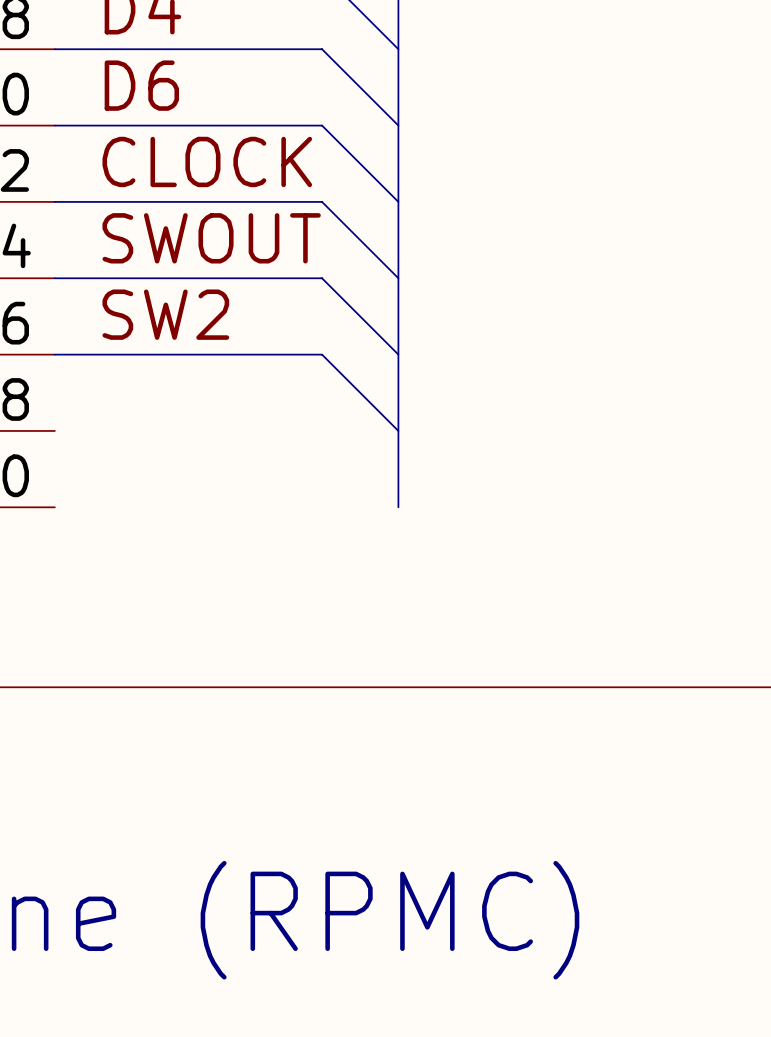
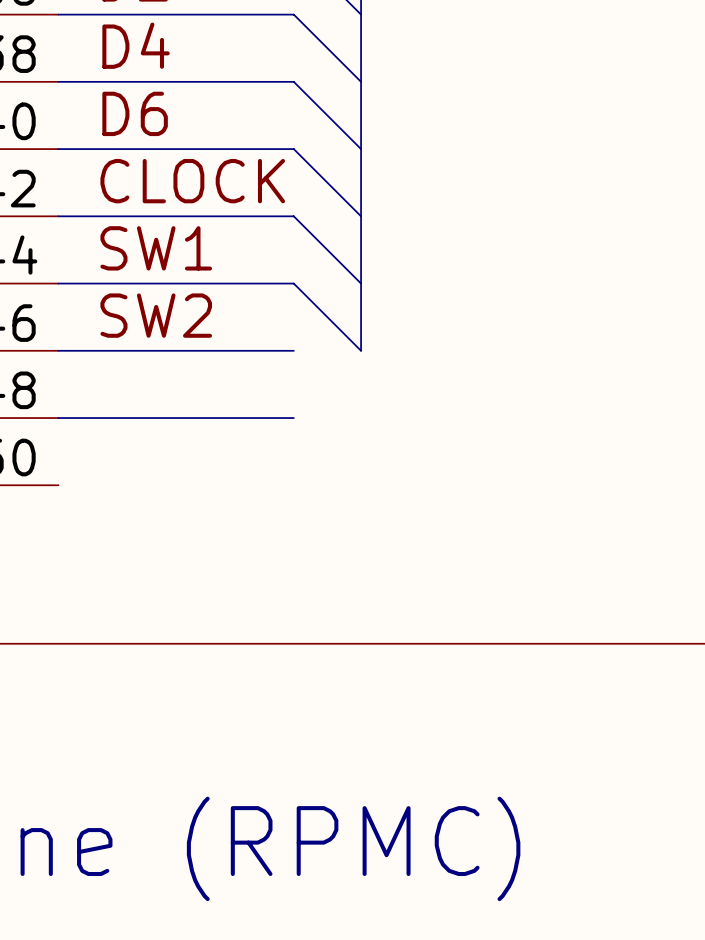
label: SWOUT (211, 238) -> SW1 (156, 248)
wire: (322, 354) (398, 430) -> none
bus: (398, 354) (398, 507) -> none
wire: none -> (58, 418) (293, 418)

